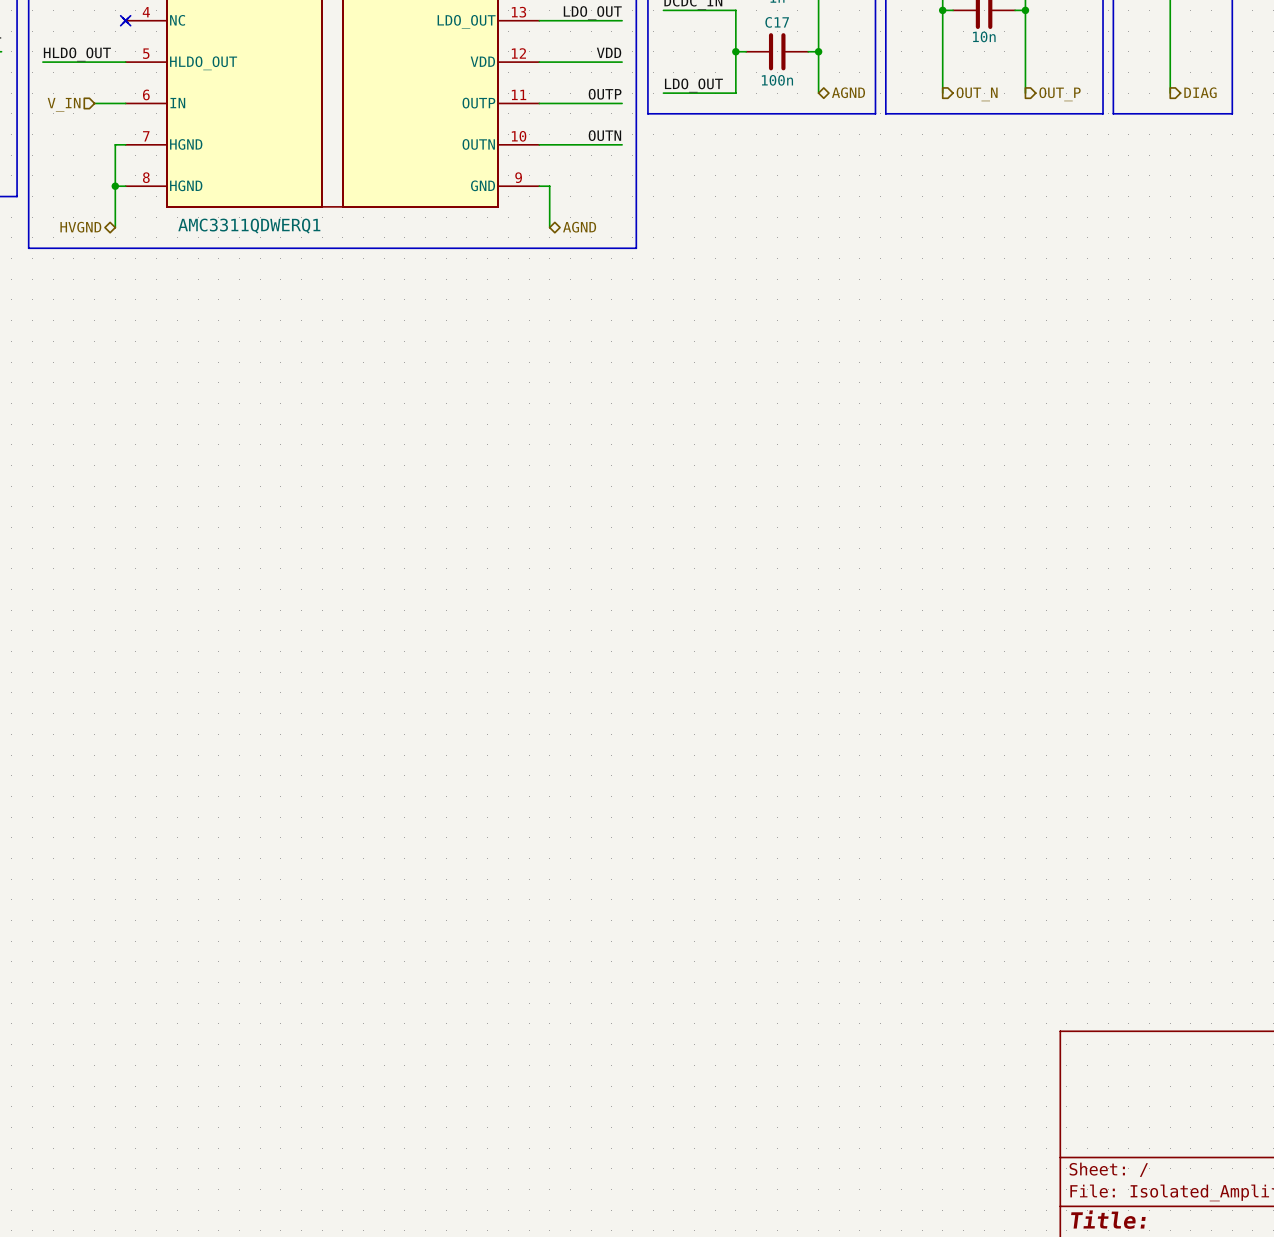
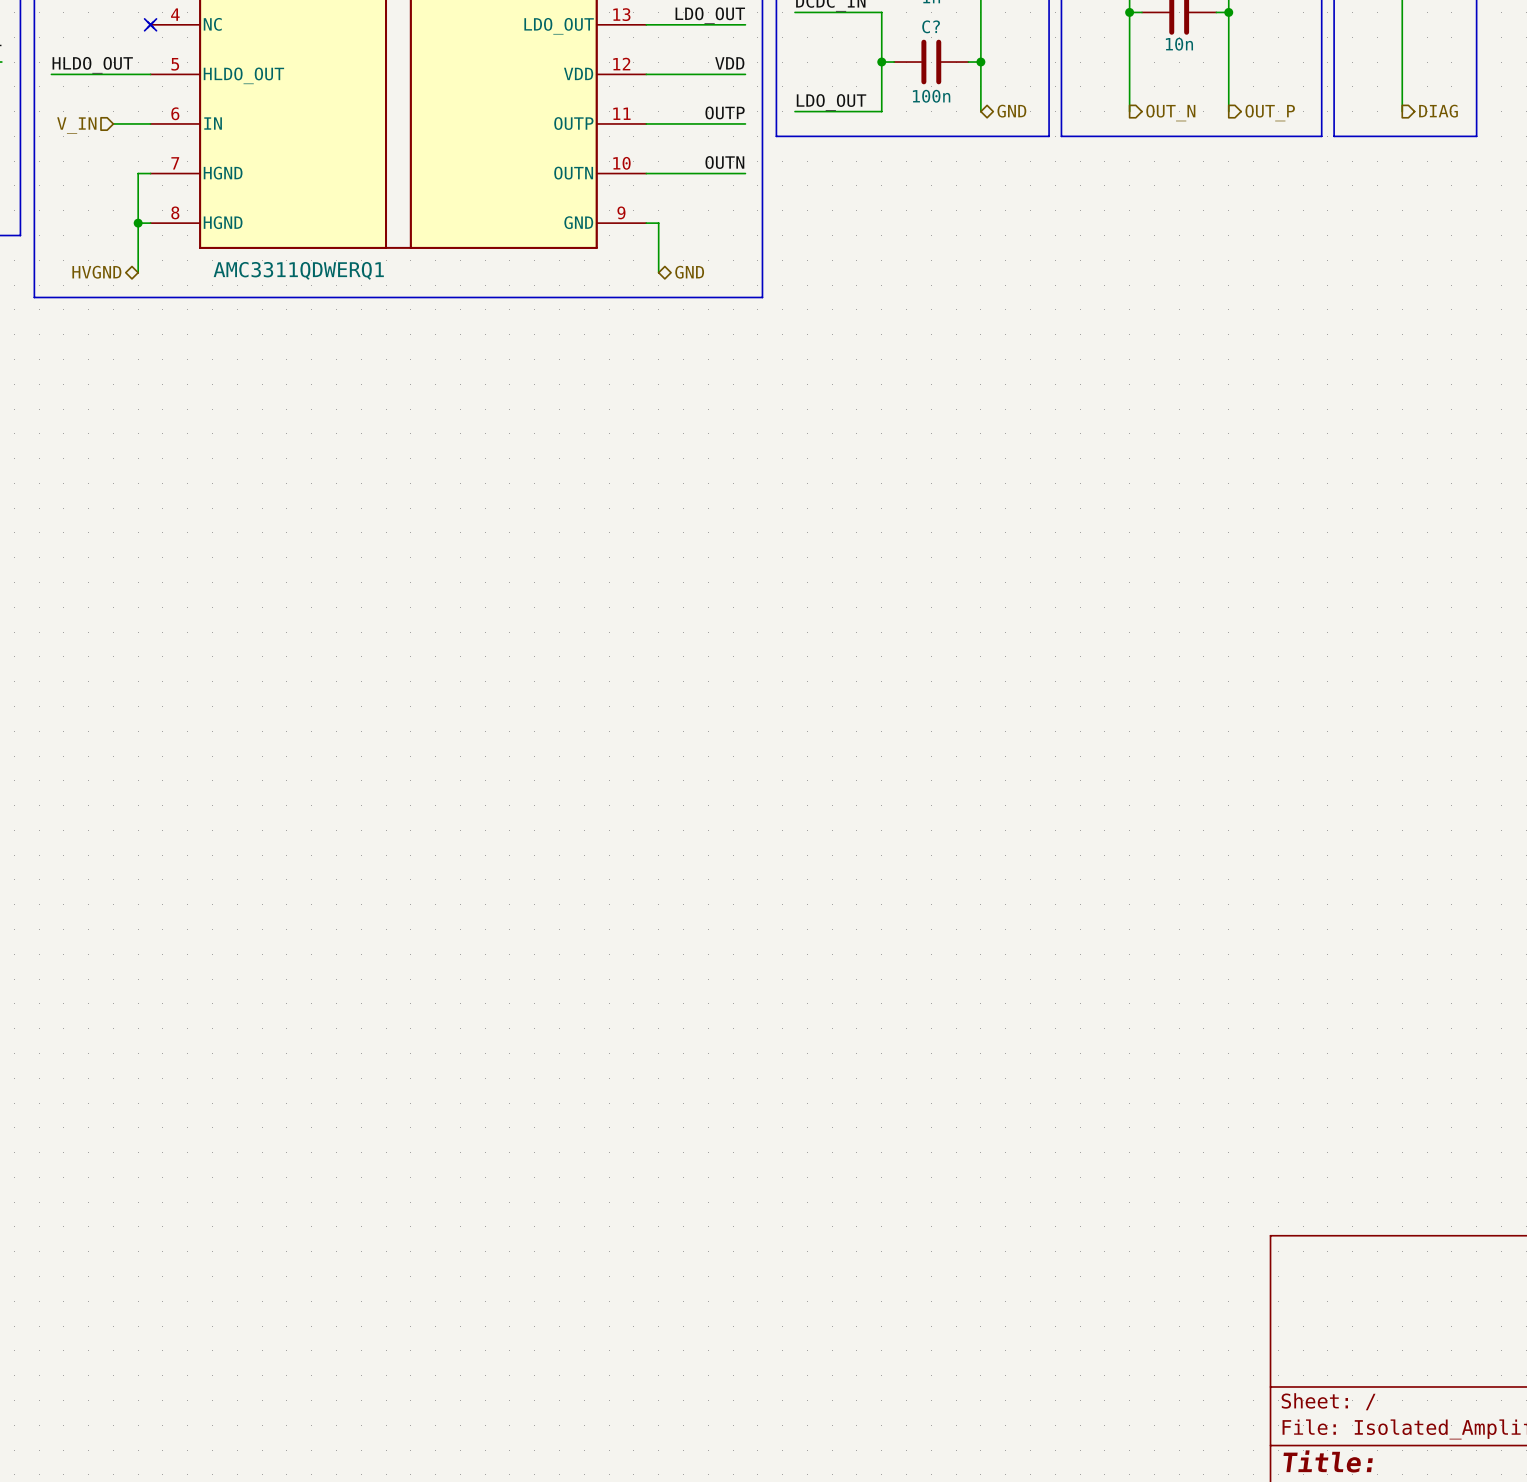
C17 name: C17 (777, 22) -> C? (931, 26)
hierarchical label: AGND (848, 92) -> GND (1011, 111)
hierarchical label: AGND (579, 227) -> GND (689, 272)

